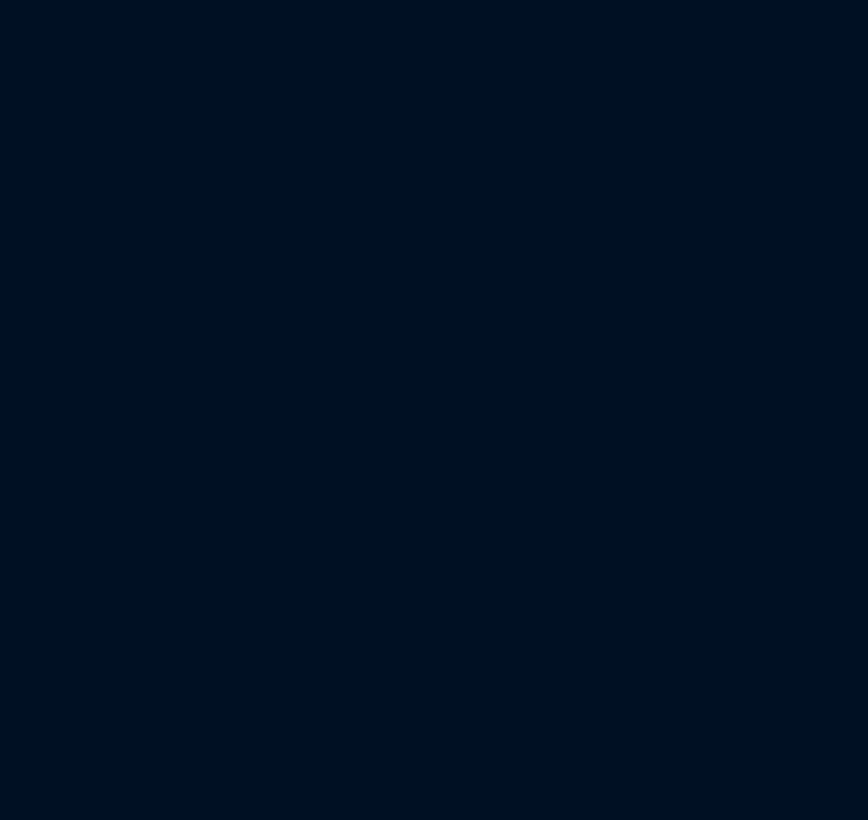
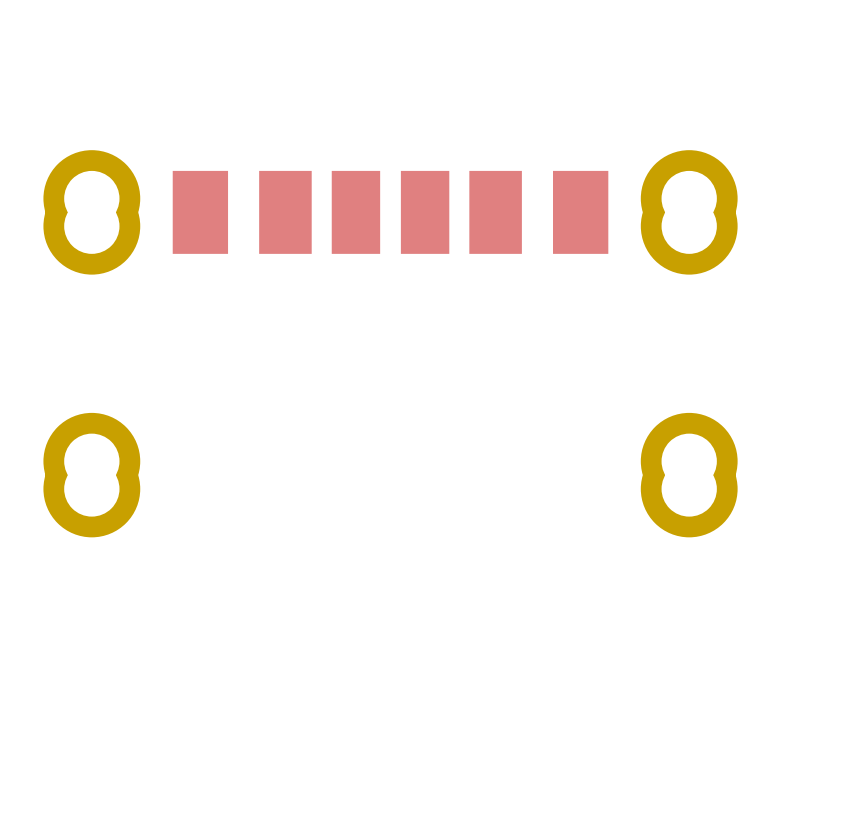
part: none -> (390, 343)

